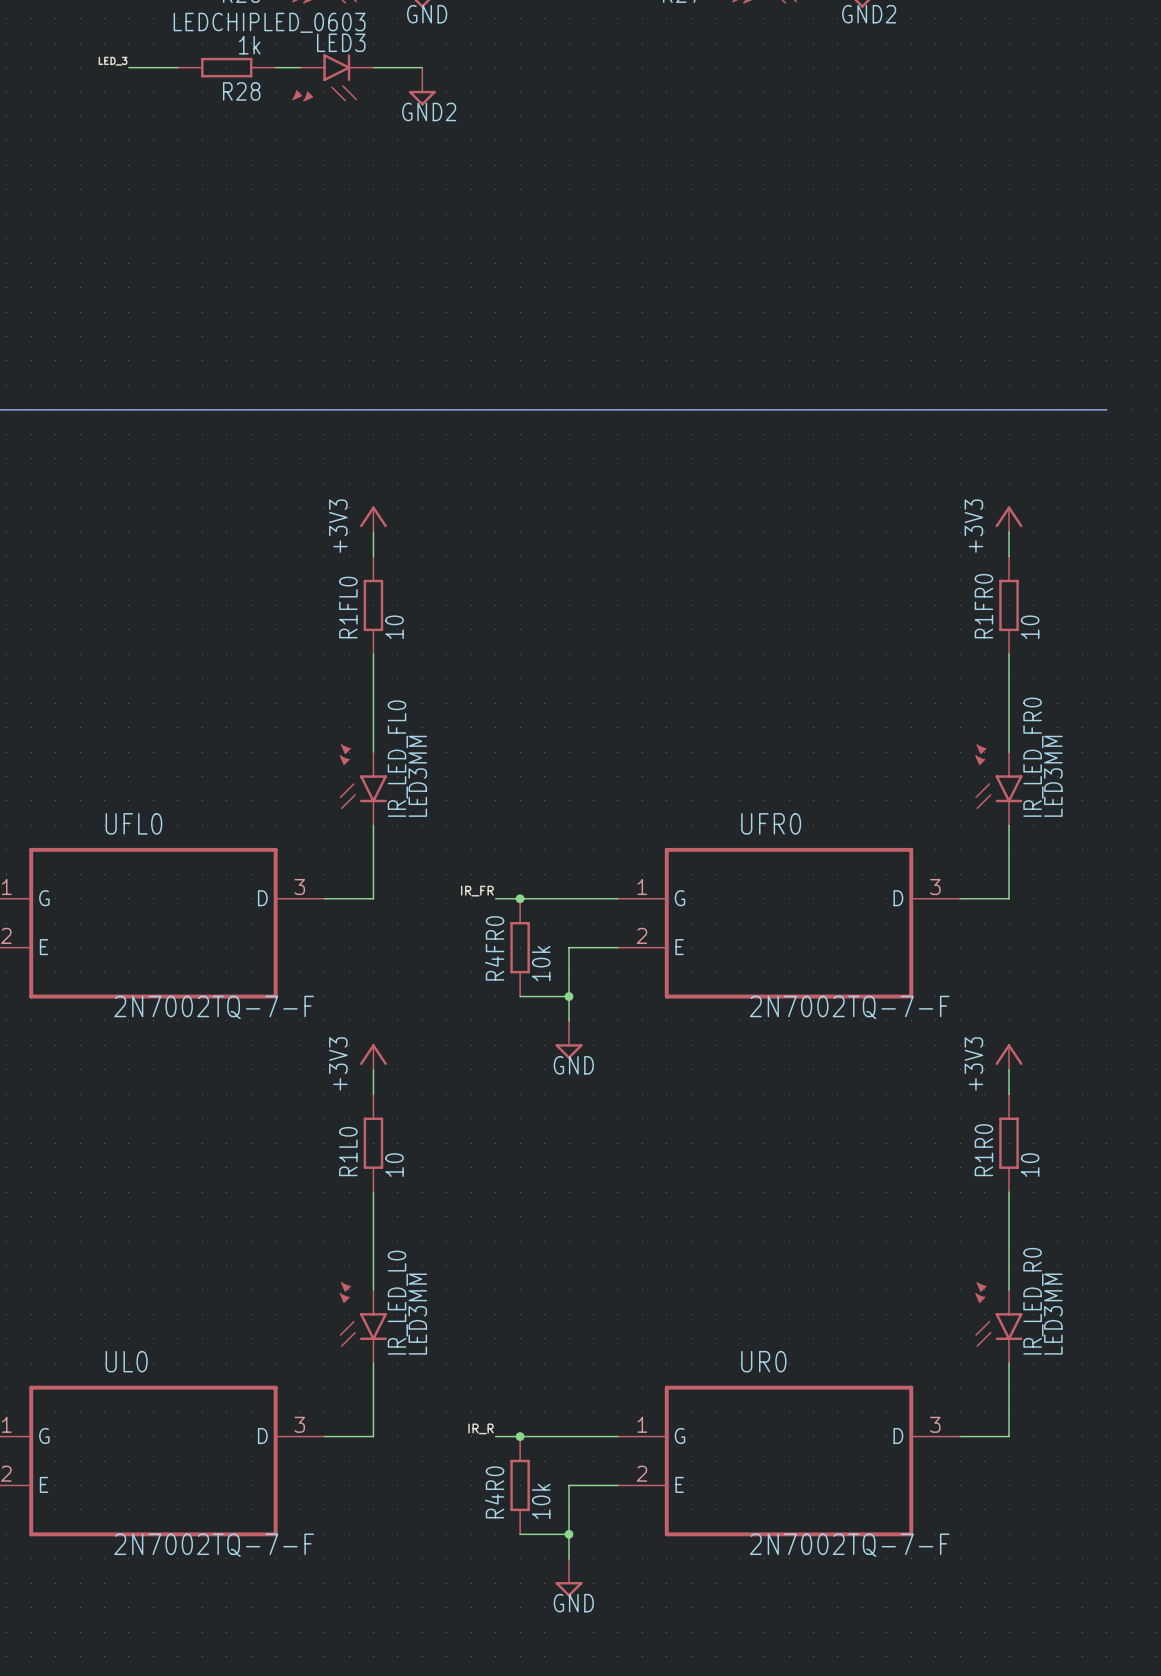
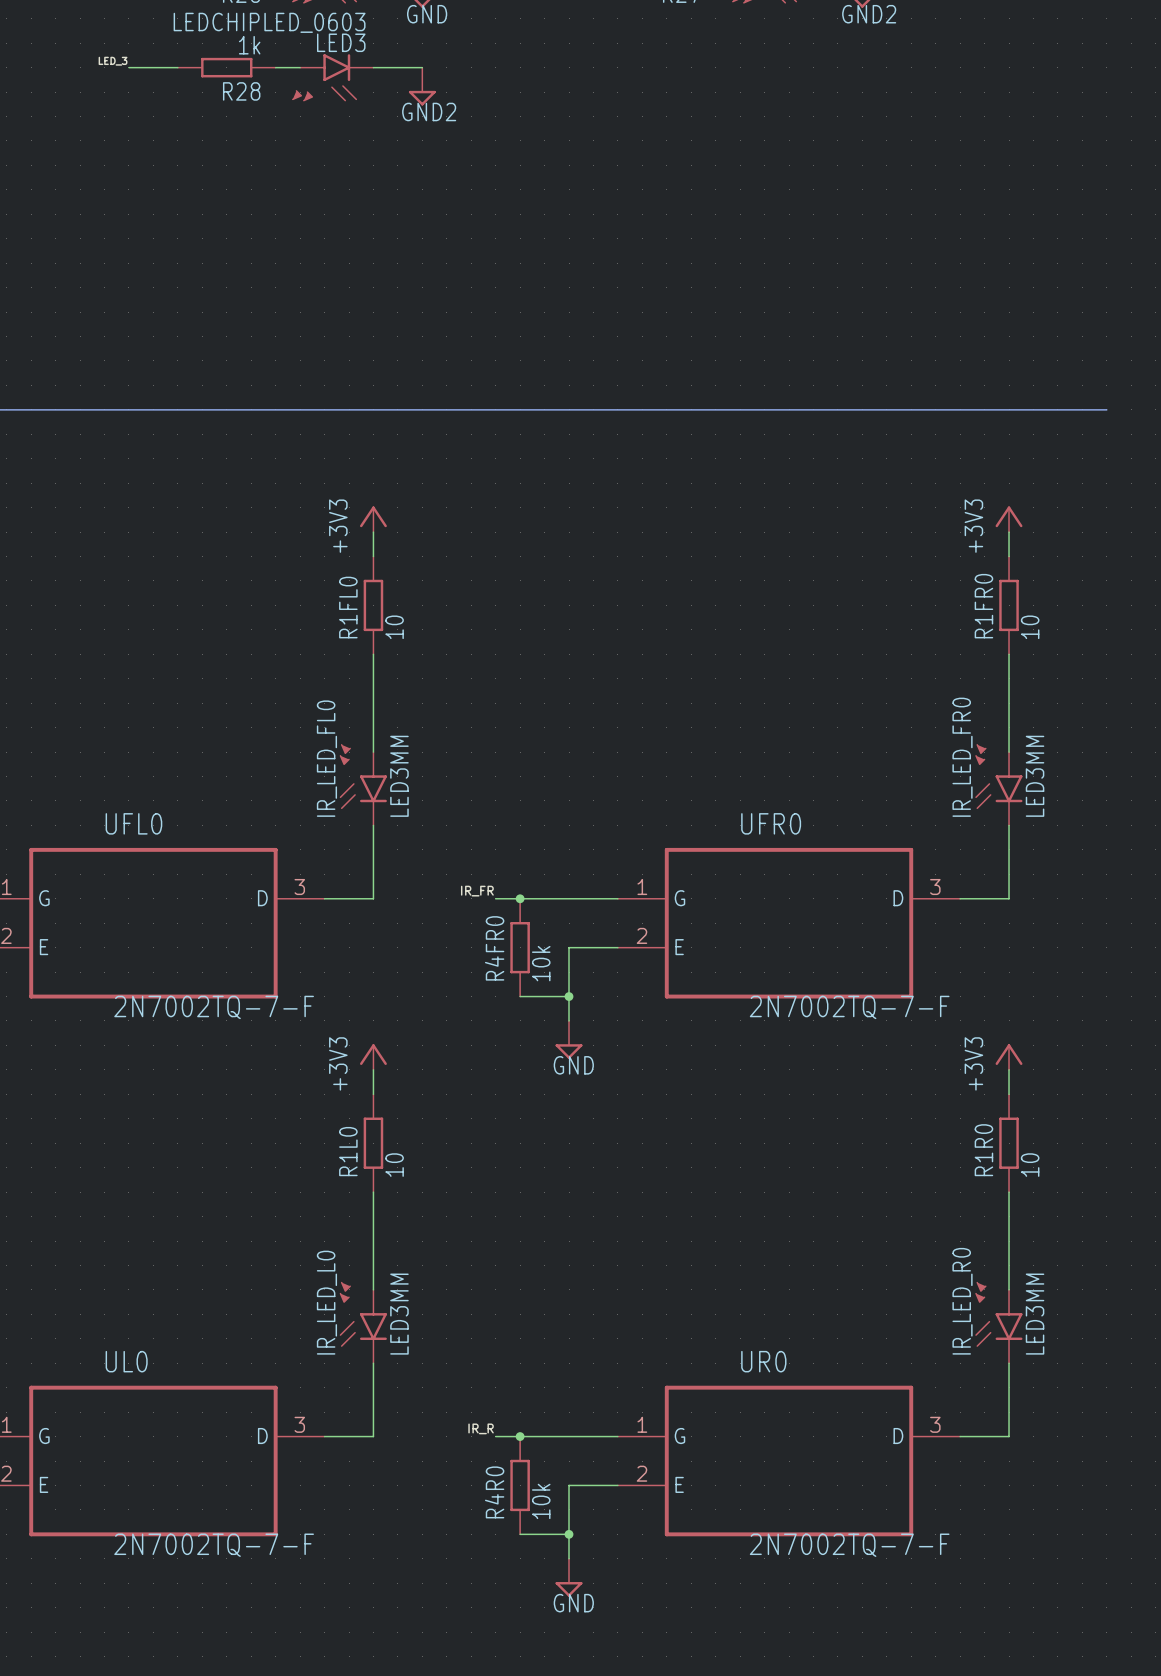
IR_LED_FR0 name position: IR_LED_FR0 (1033, 757) -> IR_LED_FR0 (962, 757)
IR_LED_FL0 name position: IR_LED_FL0 (397, 758) -> IR_LED_FL0 (326, 758)
IR_LED_FL0 value position: LED3MM (417, 776) -> LED3MM (399, 776)
IR_LED_FR0 value position: LED3MM (1053, 776) -> LED3MM (1035, 776)
IR_LED_R0 name position: IR_LED_R0 (1033, 1301) -> IR_LED_R0 (962, 1301)
IR_LED_L0 name position: IR_LED_L0 (397, 1302) -> IR_LED_L0 (326, 1302)
IR_LED_L0 value position: LED3MM (417, 1314) -> LED3MM (399, 1314)
IR_LED_R0 value position: LED3MM (1053, 1314) -> LED3MM (1035, 1314)

